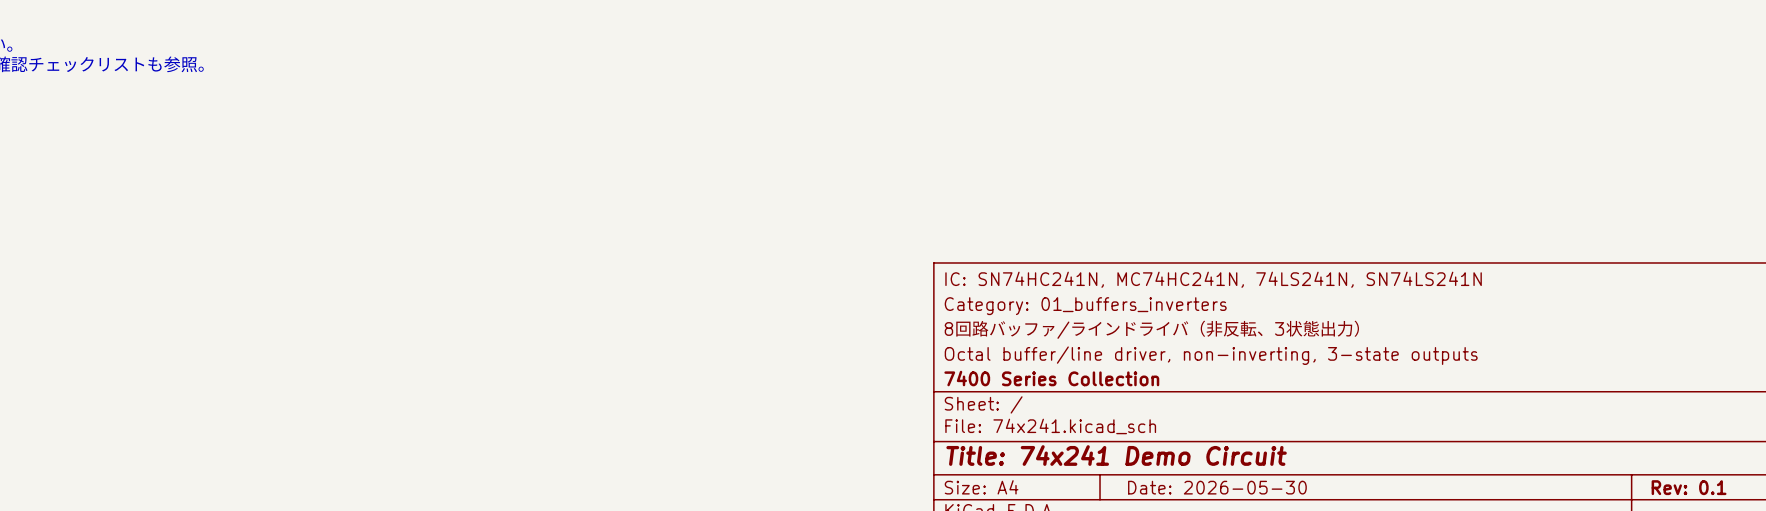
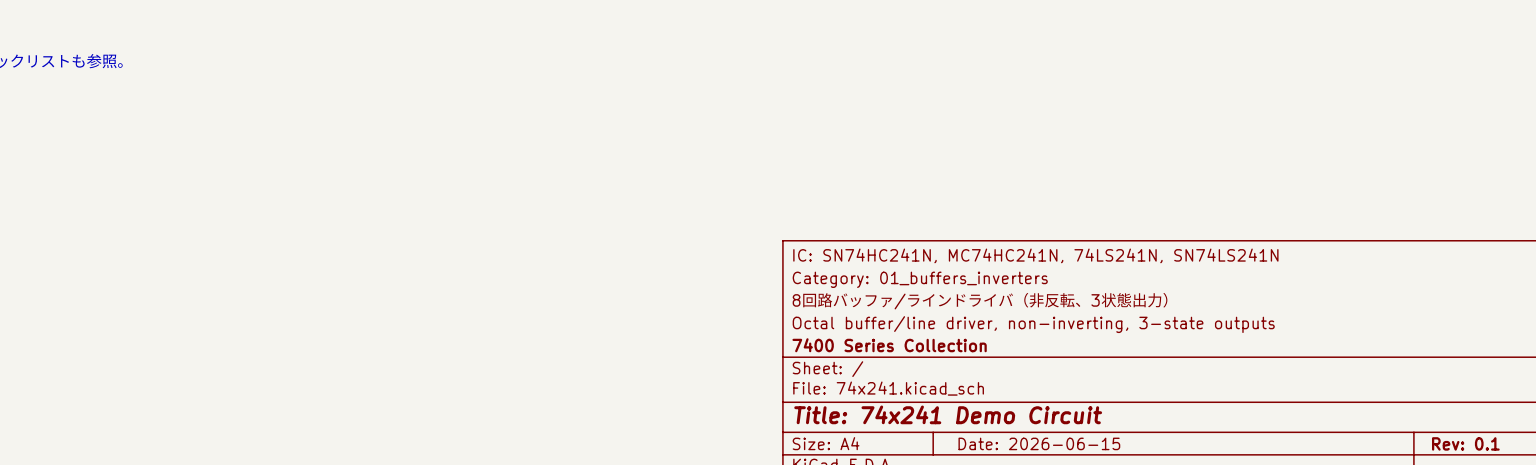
title block: Date: 2026-05-30 (1217, 487) -> Date: 2026-06-15 (1039, 443)

